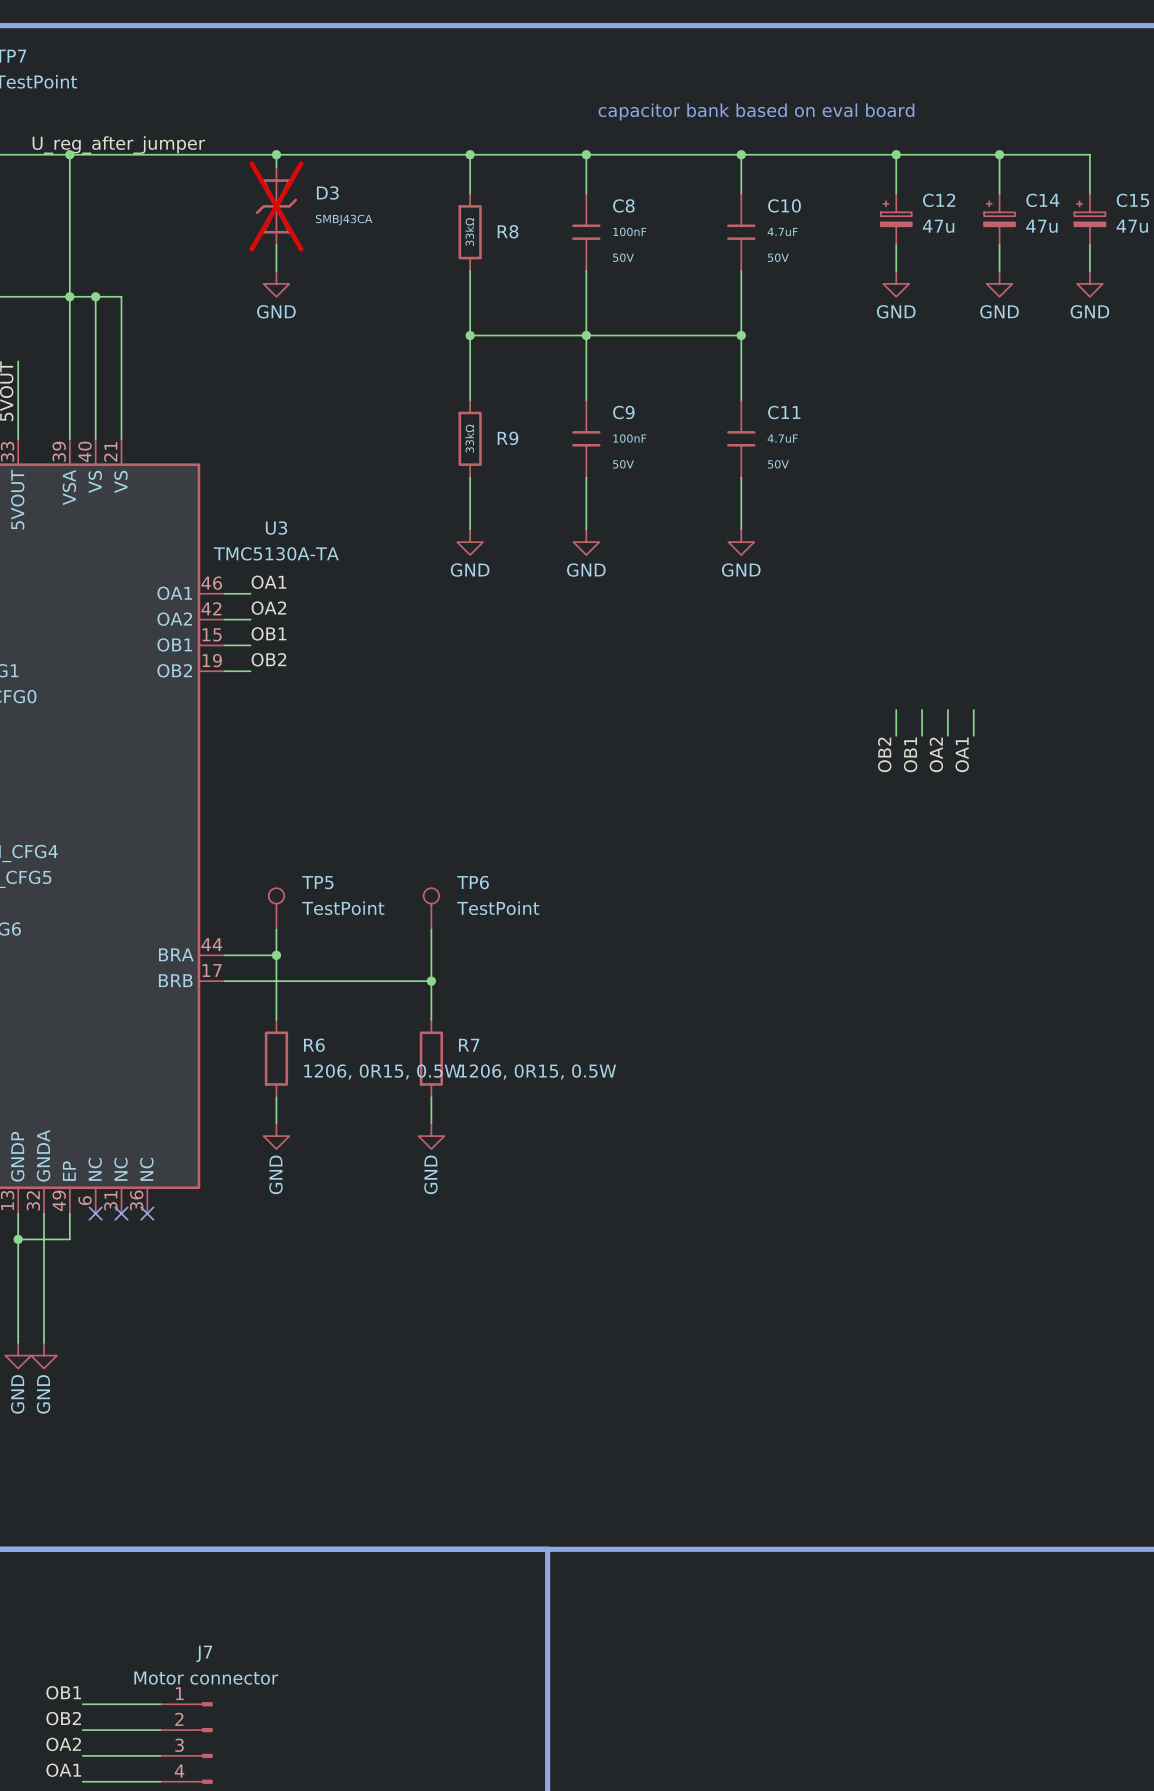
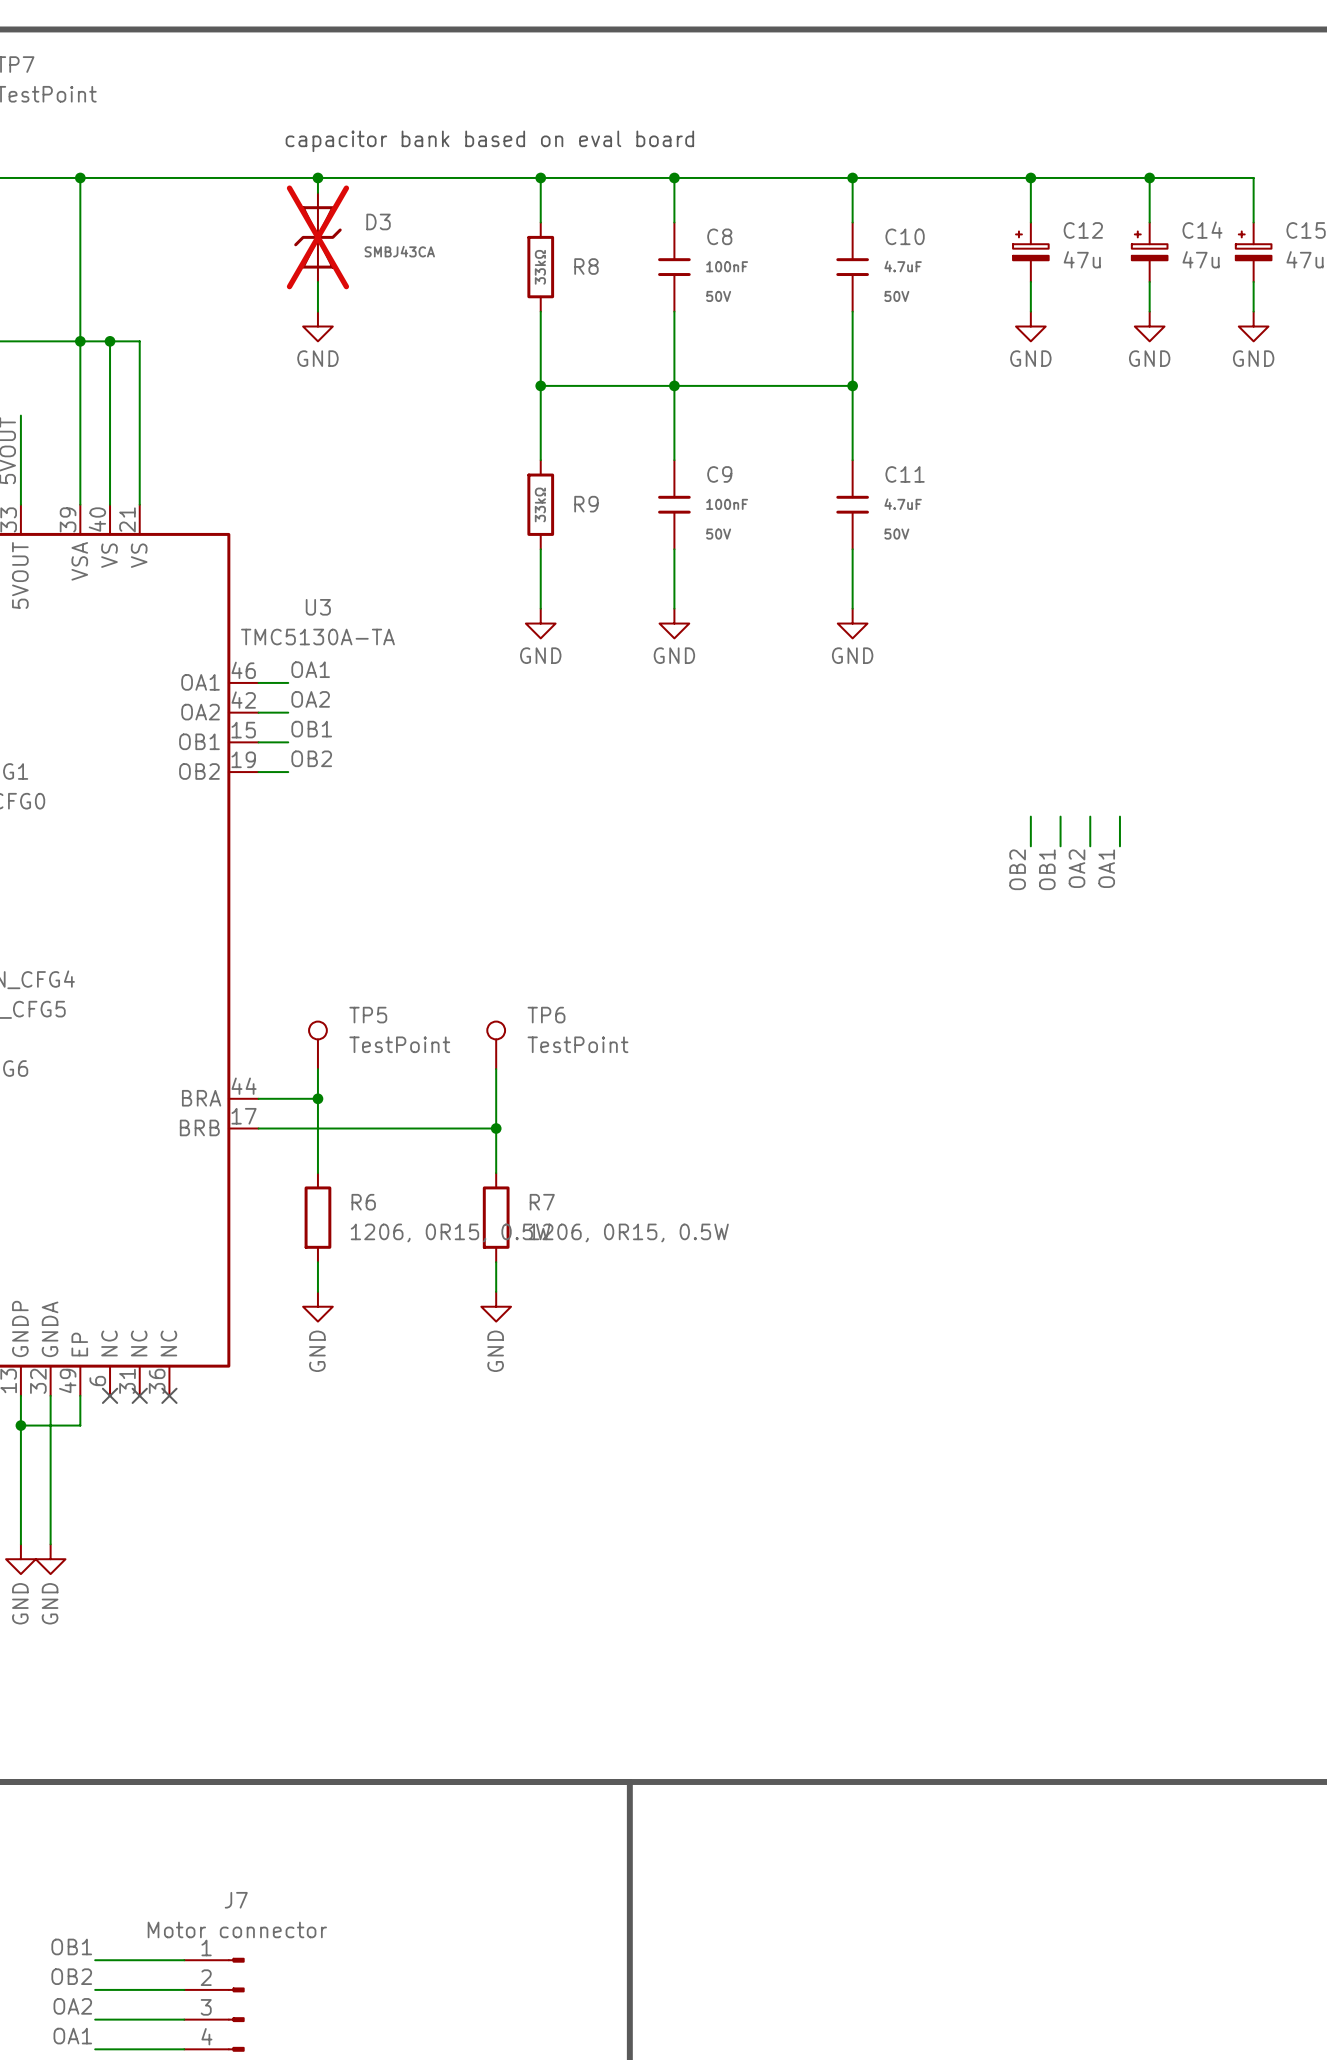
text: capacitor bank based on eval board (756, 111) -> none
text: none -> capacitor bank based on eval board (489, 141)
label: U_reg_after_jumper (118, 145) -> none

